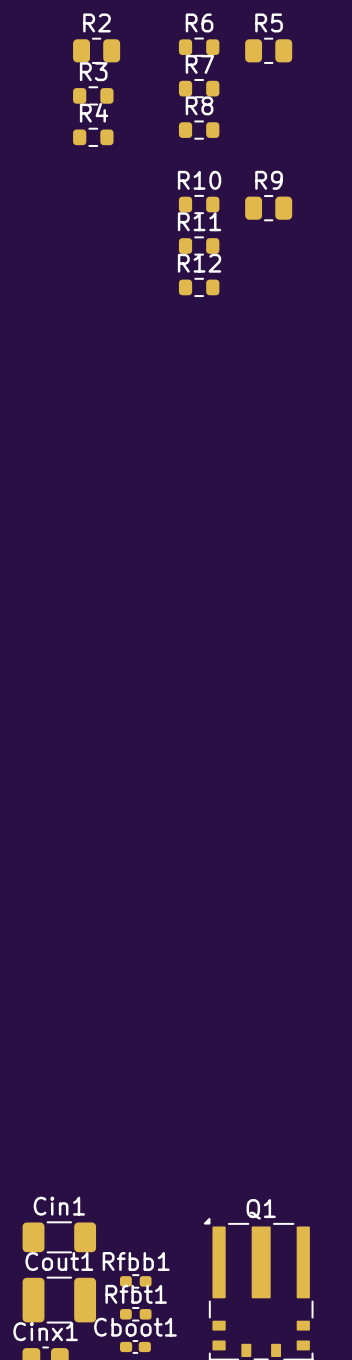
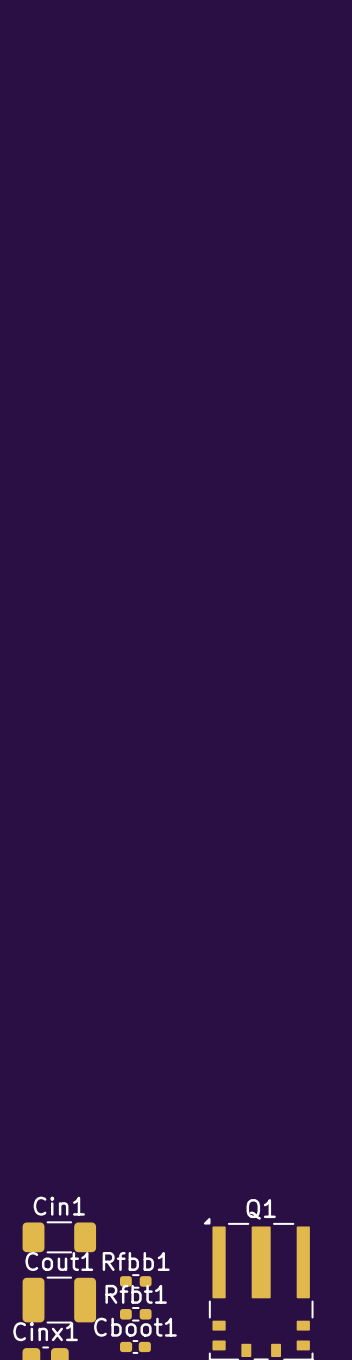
R6: (199, 47) -> none
R2: (96, 50) -> none
R5: (268, 50) -> none
R7: (199, 88) -> none
R3: (93, 95) -> none
R8: (199, 130) -> none
R4: (93, 137) -> none
R10: (199, 204) -> none
R9: (268, 208) -> none
R11: (199, 245) -> none
R12: (199, 287) -> none

